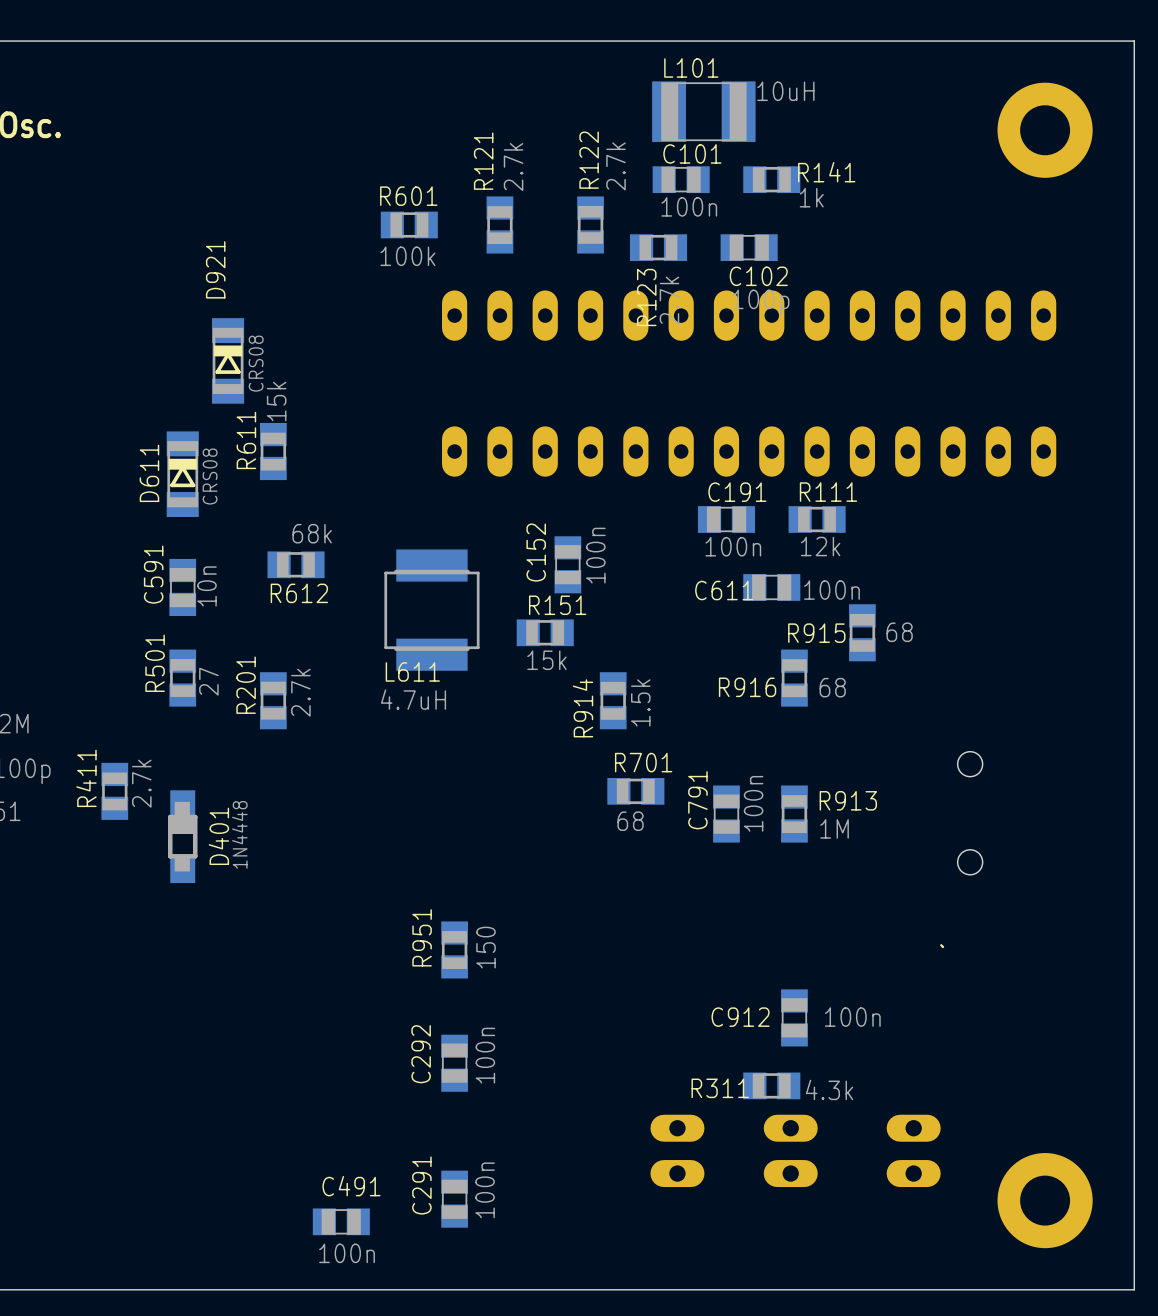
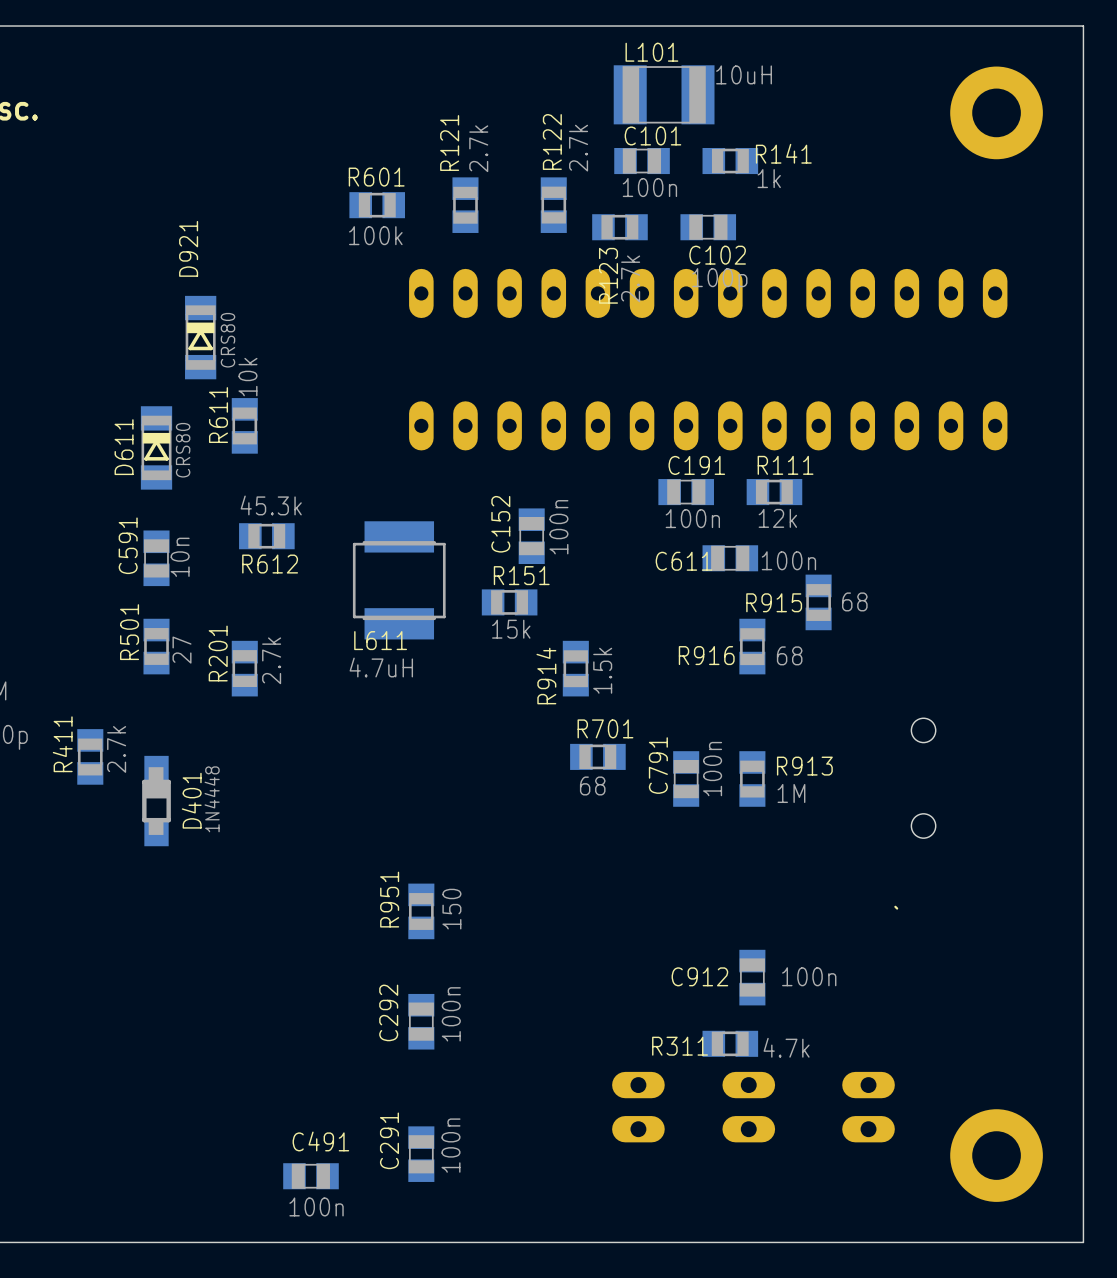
D921 value: CRS08 (256, 363) -> CRS80 (227, 340)
R611 value: 15k (276, 401) -> 10k (247, 377)
D611 value: CRS08 (210, 476) -> CRS80 (183, 450)
R612 value: 68k (312, 533) -> 45.3k (271, 505)
R311 value: 4.3k (829, 1089) -> 4.7k (786, 1047)

